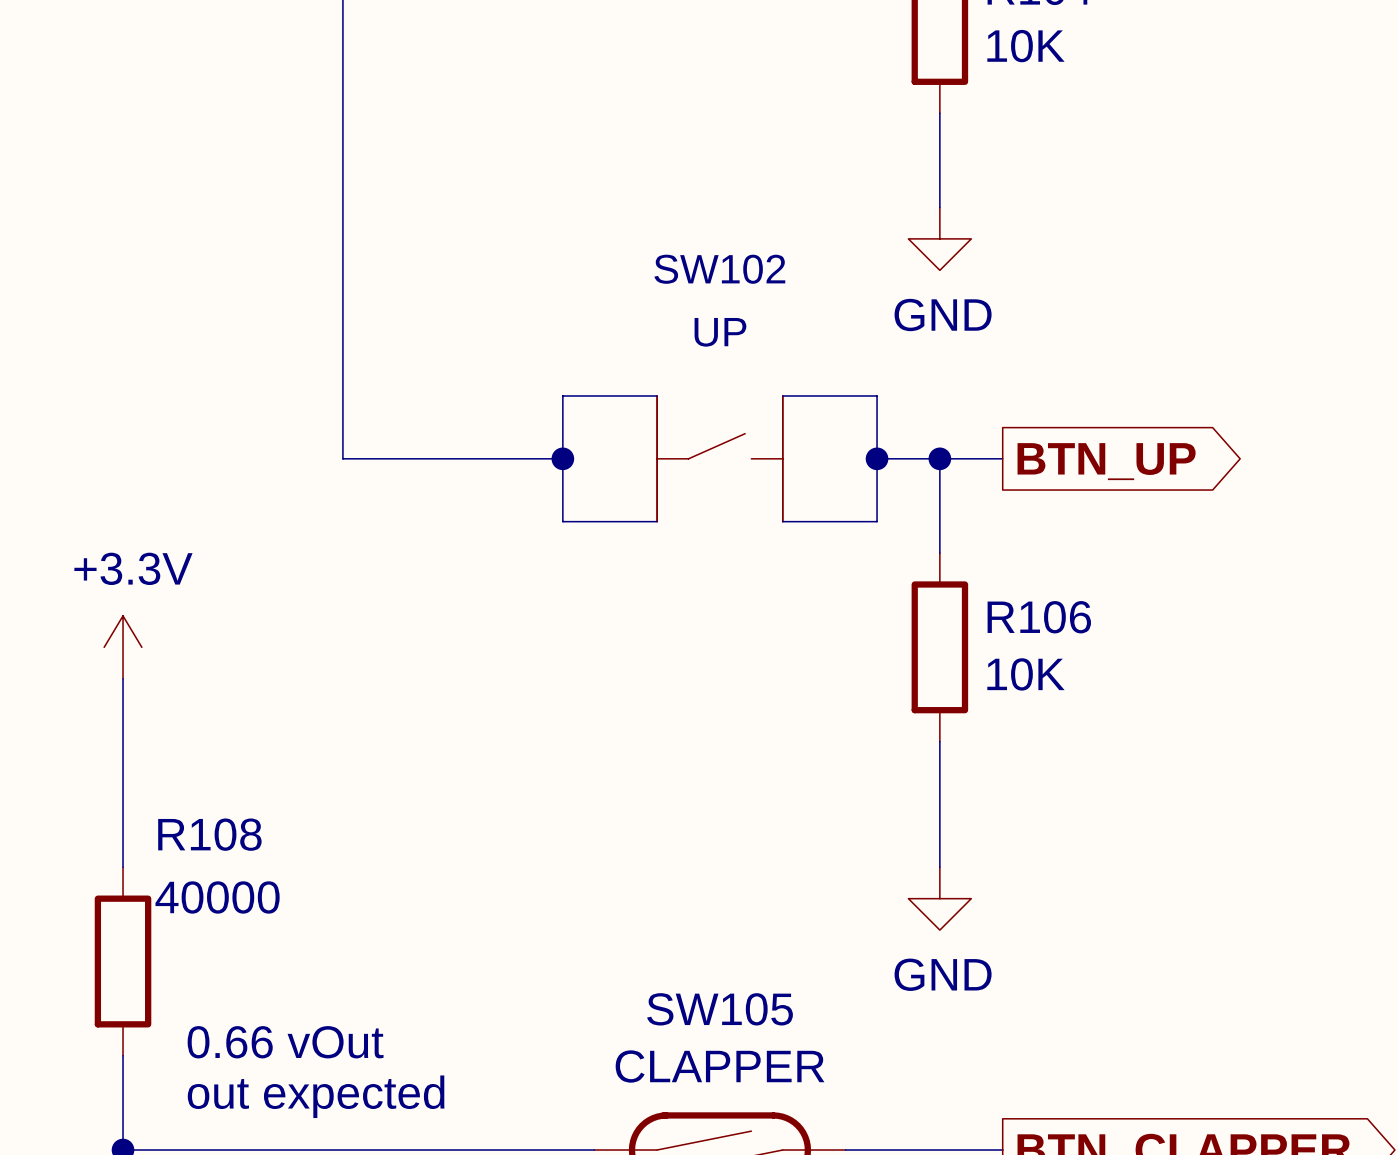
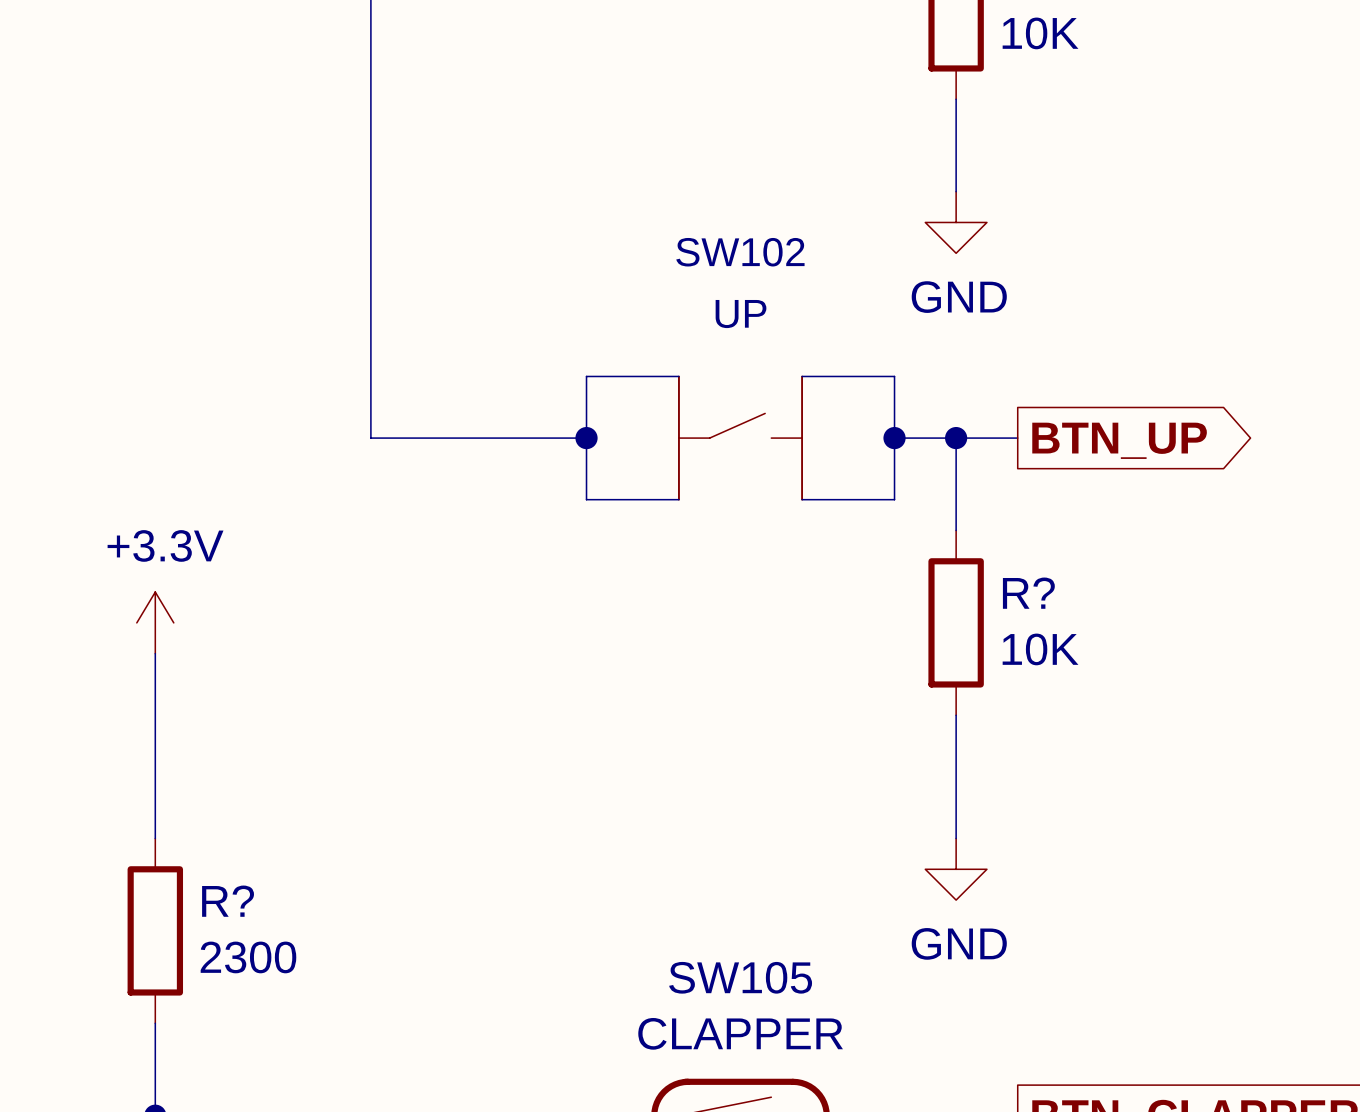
R106 name: R106 (1039, 617) -> R? (1028, 593)
R108 name: R108 (209, 834) -> R? (228, 901)
R108 value: 40000 (217, 897) -> 2300 (248, 957)
text: 0.66 vOut (285, 1042) -> none
text: out expected (316, 1096) -> none

